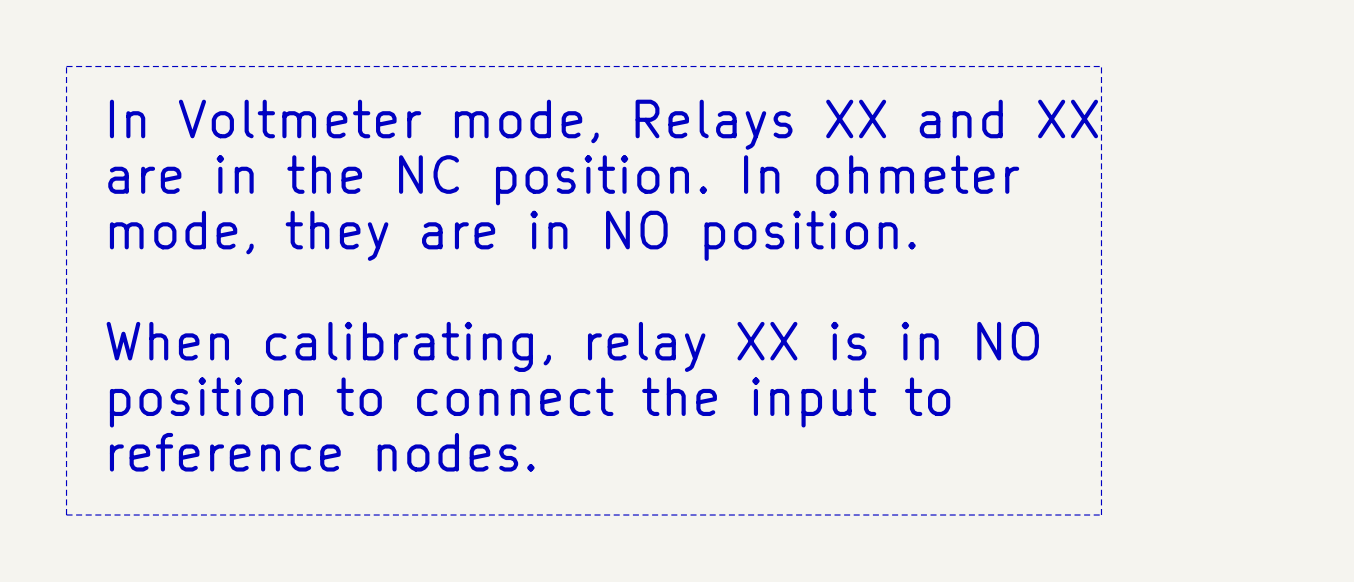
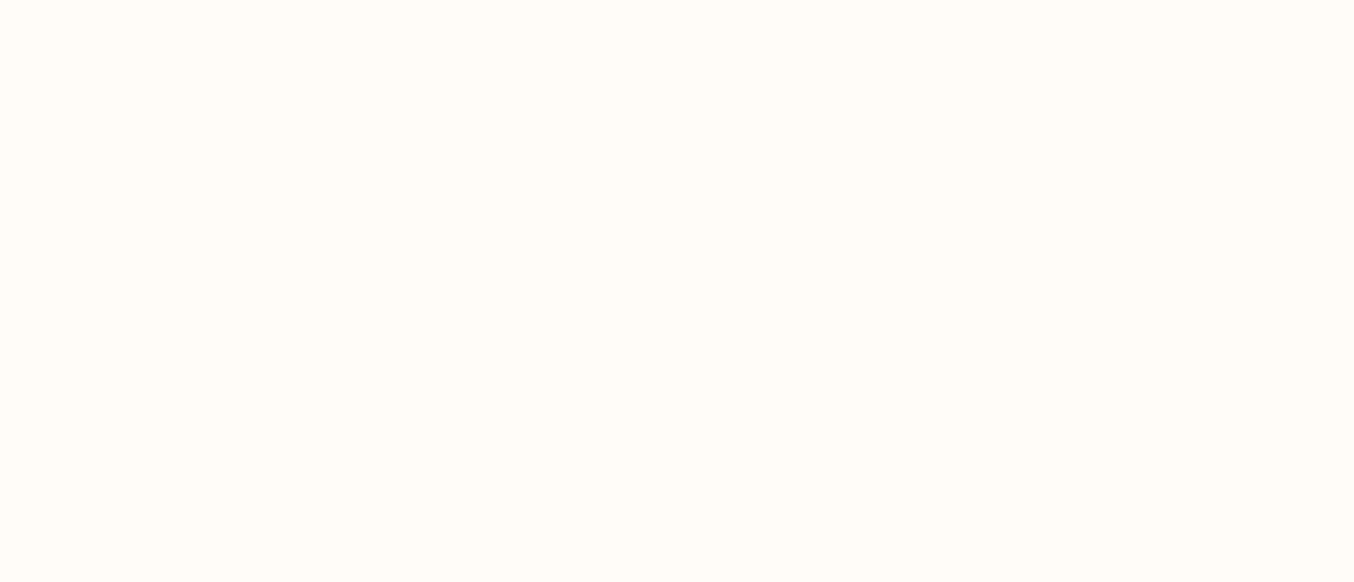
line: (66, 66) (1101, 66) (1101, 515) (66, 515) (66, 66) -> none
text: In Voltmeter mode, Relays XX and XX (603, 124) -> none
text: are in the NC position. In ohmeter (563, 180) -> none
text: mode, they are in NO position. (512, 235) -> none
text: When calibrating, relay XX is in NO (572, 346) -> none
text: position to connect the input to (530, 402) -> none
text: reference nodes. (322, 452) -> none

